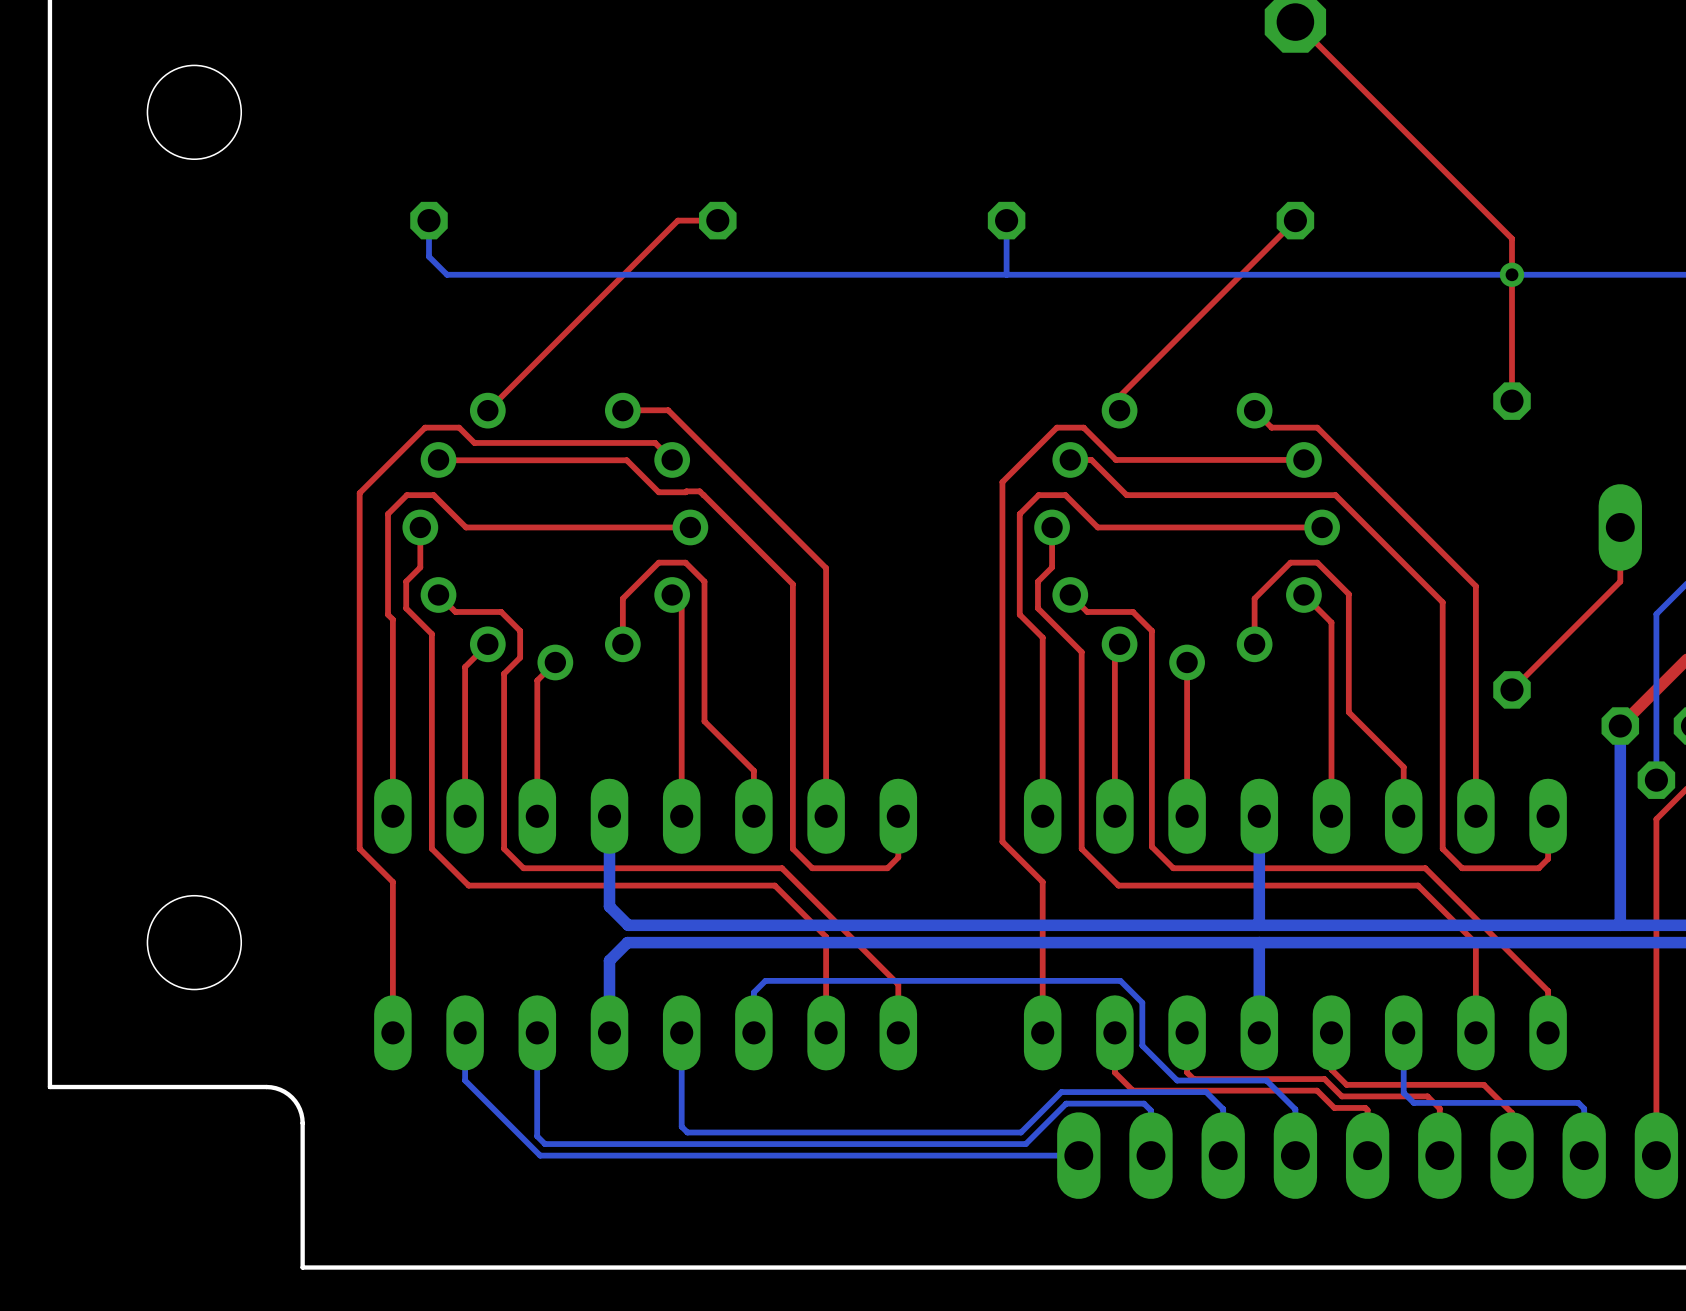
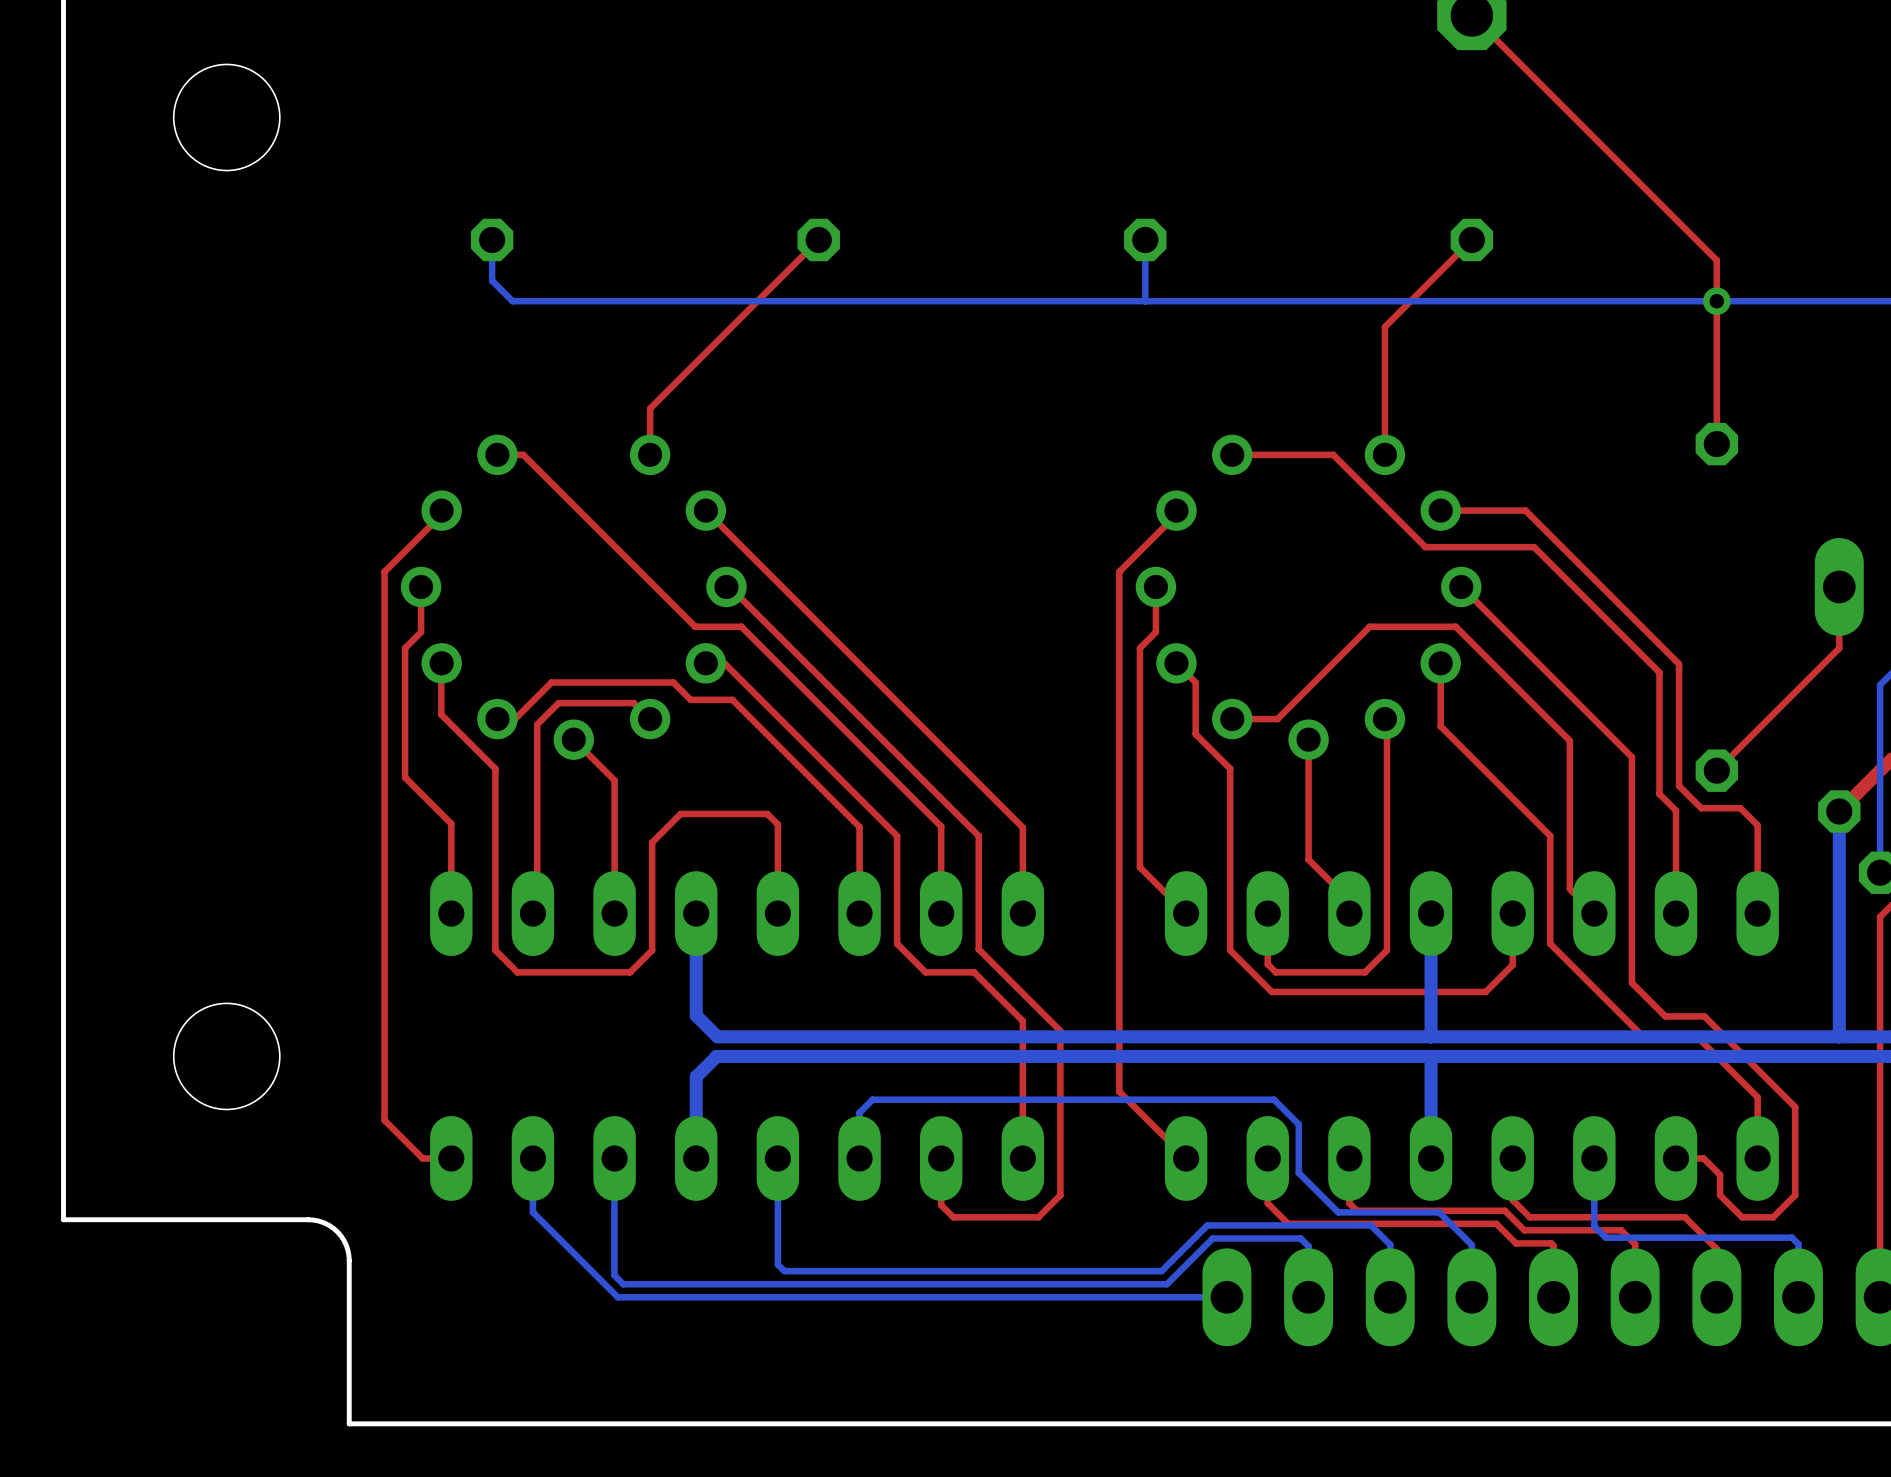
top track: (717, 220) (677, 220) (487, 410) -> (818, 239) (650, 408) (650, 454)
top track: (1218, 297) (1119, 396) (1119, 410) -> (1384, 326) (1384, 454)
top track: (623, 410) (668, 410) (826, 568) (826, 739) -> (497, 454) (523, 454) (695, 626) (741, 626) (941, 826)
top track: (1254, 410) (1271, 427) (1317, 427) (1475, 586) (1475, 725) -> (1232, 454) (1333, 454) (1425, 547) (1534, 547) (1659, 672) (1659, 794) (1676, 810)
top track: none -> (705, 510) (1022, 827) (1022, 913)
top track: (672, 459) (655, 442) (474, 442) (459, 427) (425, 427) (359, 493) (359, 848) (392, 882) (392, 1032) -> (441, 510) (441, 514) (384, 571) (384, 1120) (422, 1158) (451, 1158)
top track: (1070, 459) (1091, 459) (1126, 495) (1335, 495) (1442, 602) (1442, 848) (1462, 868) (1538, 868) (1548, 858) (1548, 816) -> (1481, 510) (1525, 510) (1679, 664) (1679, 786) (1701, 808) (1740, 808) (1757, 825) (1757, 913)
top track: (1267, 459) (1115, 459) (1083, 427) (1056, 427) (1002, 482) (1002, 841) (1042, 882) (1042, 1032) -> (1176, 510) (1176, 514) (1119, 571) (1119, 1091) (1186, 1158)
top track: (438, 460) (626, 460) (658, 492) (699, 491) (703, 495) -> none
top track: (703, 495) (792, 584) (792, 848) -> (705, 663) (724, 663) (897, 835) (897, 943) (903, 950)
top track: (420, 527) (420, 567) (406, 581) (406, 608) (431, 634) (431, 688) -> (441, 663) (441, 714) (495, 768)
top track: (636, 527) (466, 527) (433, 495) (406, 495) (388, 514) (388, 614) (392, 619) (392, 736) -> (421, 586) (421, 632) (405, 648) (405, 777) (451, 823)
top track: (690, 527) (639, 527) -> none
top track: (1052, 527) (1052, 567) (1037, 581) (1037, 608) (1081, 652) (1081, 688) -> (1176, 663) (1195, 682) (1195, 734) (1230, 768)
top track: (1286, 527) (1097, 527) (1065, 495) (1038, 495) (1019, 514) (1019, 614) (1042, 637) (1042, 816) -> (1155, 586) (1155, 632) (1139, 648) (1139, 867) (1186, 913)
top track: (1322, 527) (1286, 527) -> (1676, 1158) (1703, 1158) (1720, 1174) (1720, 1195) (1742, 1217) (1773, 1217) (1795, 1195) (1795, 1107) (1704, 1016) (1665, 1016) (1631, 982) (1631, 757) (1461, 586)
part position: (555, 536) -> (573, 597)
part position: (1187, 536) -> (1308, 597)
top track: (438, 594) (455, 611) (481, 611) -> (497, 719) (514, 719) (551, 682)
top track: (672, 594) (681, 604) (681, 737) -> (630, 972) (652, 950) (652, 842) (680, 813) (767, 813) (777, 824)
top track: (1070, 594) (1087, 611) (1132, 611) (1151, 630) (1151, 846) (1173, 868) -> (1267, 913) (1267, 964) (1275, 972) (1333, 972)
top track: (1303, 594) (1331, 622) (1331, 816) -> none
top track: (501, 611) (520, 630) (520, 657) (504, 673) (504, 848) (523, 868) -> (517, 972) (599, 972)
top track: (487, 644) (465, 667) (465, 816) -> (650, 719) (633, 703) (558, 703) (537, 724) (537, 909) (532, 913)
top track: (622, 644) (622, 598) (658, 562) (685, 562) (704, 581) (704, 721) (753, 770) -> (573, 682) (673, 682) (690, 699) (732, 699) (859, 827) (859, 862)
top track: (1119, 644) (1114, 648) (1114, 816) -> none
top track: none -> (1384, 719) (1386, 721) (1386, 950) (1364, 972)
top track: (1254, 644) (1254, 598) (1290, 562) (1317, 562) (1348, 594) (1348, 712) (1403, 767) (1403, 816) -> (1232, 719) (1277, 719) (1369, 626) (1455, 626) (1569, 740) (1569, 889) (1594, 913)
top track: (555, 662) (537, 680) (537, 698) -> (573, 739) (614, 780)
top track: (1187, 662) (1187, 804) -> (1308, 739) (1308, 859) (1349, 900)
top track: (898, 816) (898, 857) (887, 868) (855, 868) -> (1022, 1103) (1022, 1021) (974, 972)
top track: (451, 868) (468, 885) (774, 885) (826, 936) (826, 1032) -> (729, 586) (978, 835) (978, 949) (1060, 1030) (1060, 1195) (1038, 1217) (953, 1217) (941, 1205) (941, 1158)
top track: (551, 868) (782, 868) (898, 984) -> none
top track: (1200, 868) (1425, 868) (1548, 990) -> (1440, 663) (1440, 726) (1550, 835) (1550, 943) (1642, 1036) (1696, 1036) (1757, 1097) (1757, 1111)
top track: (1307, 885) (1418, 885) (1475, 943) (1475, 1032) -> (1485, 991) (1512, 965) (1512, 913)

